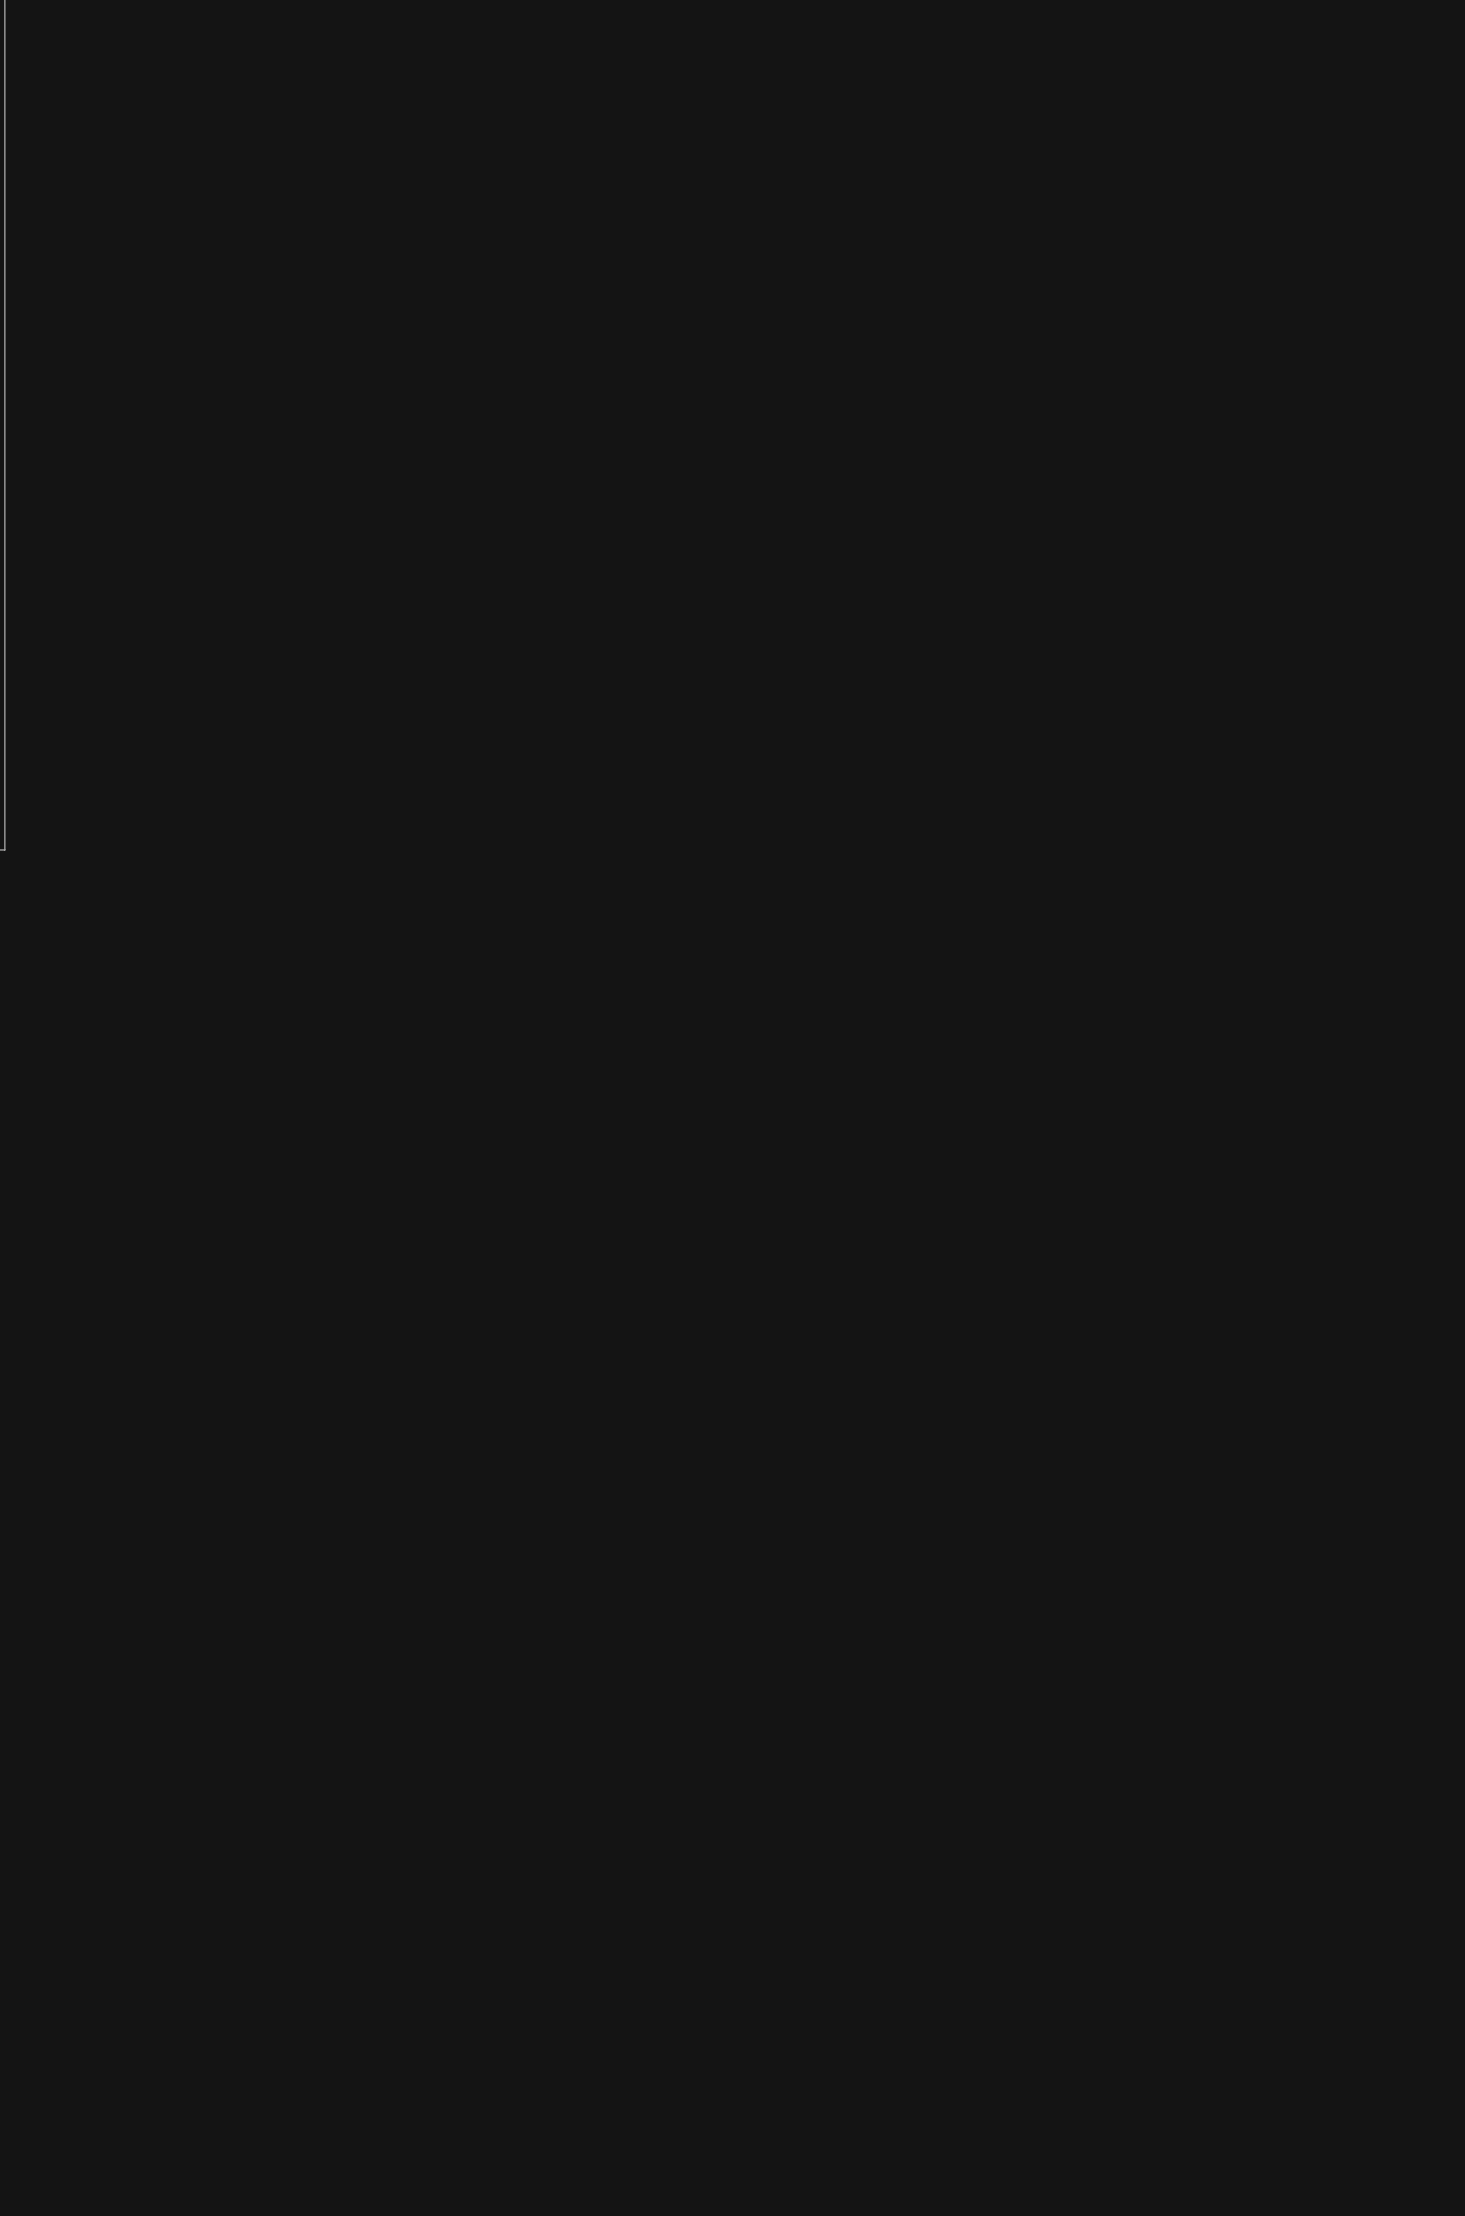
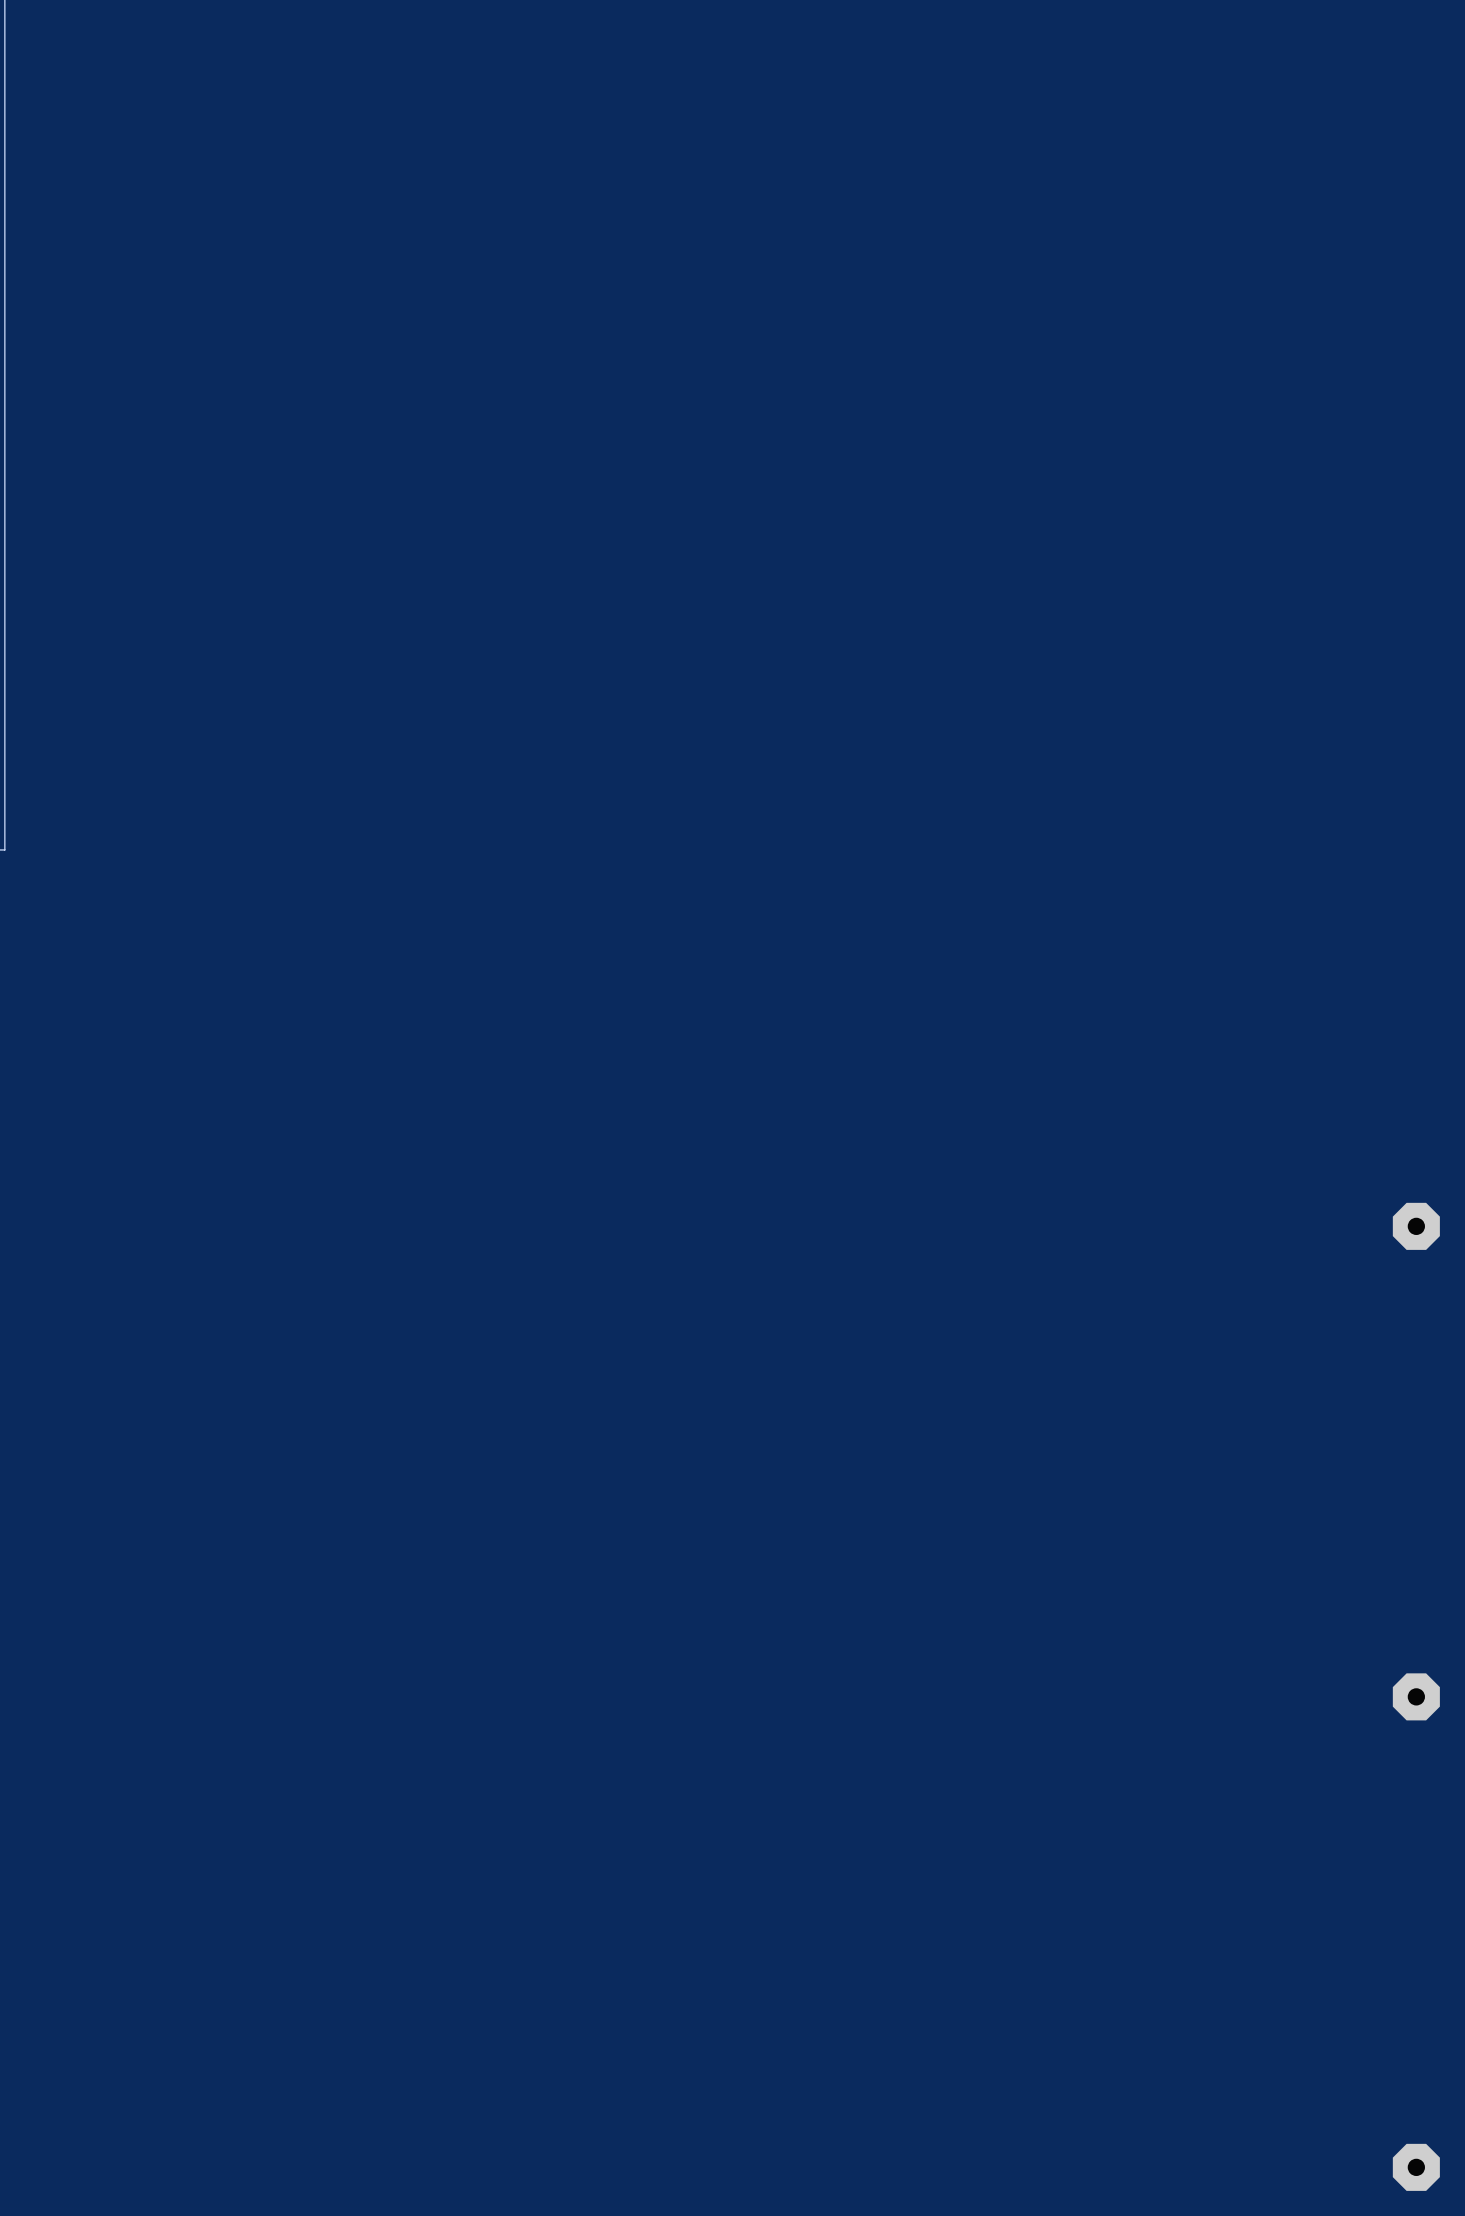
part: none -> (1416, 1226)
part: none -> (1416, 1696)
part: none -> (1416, 2167)

